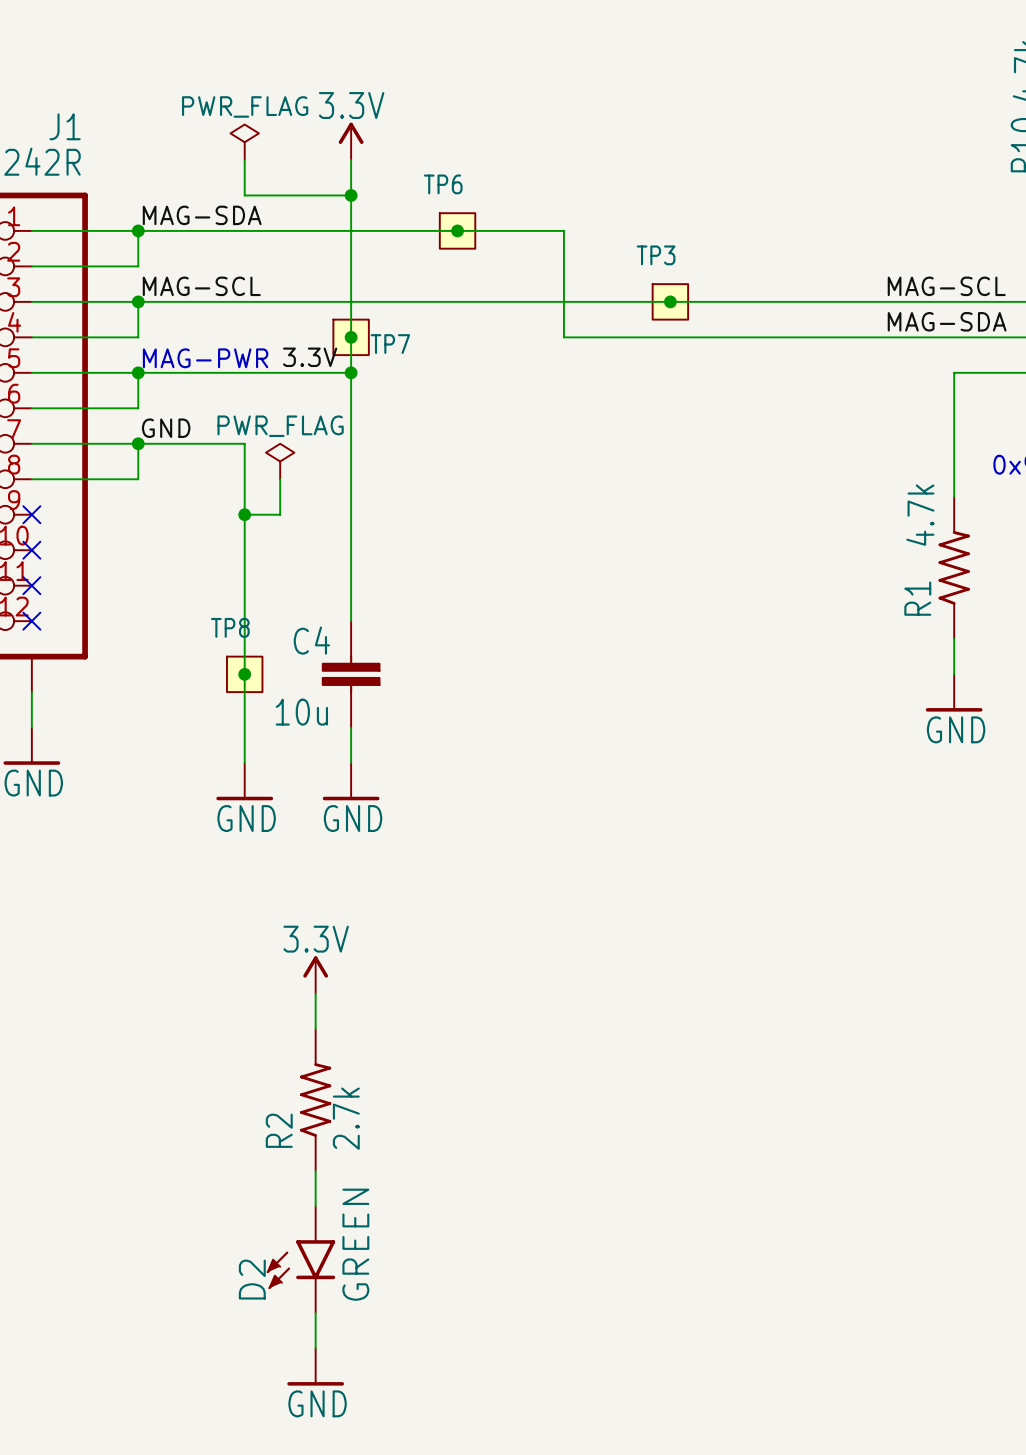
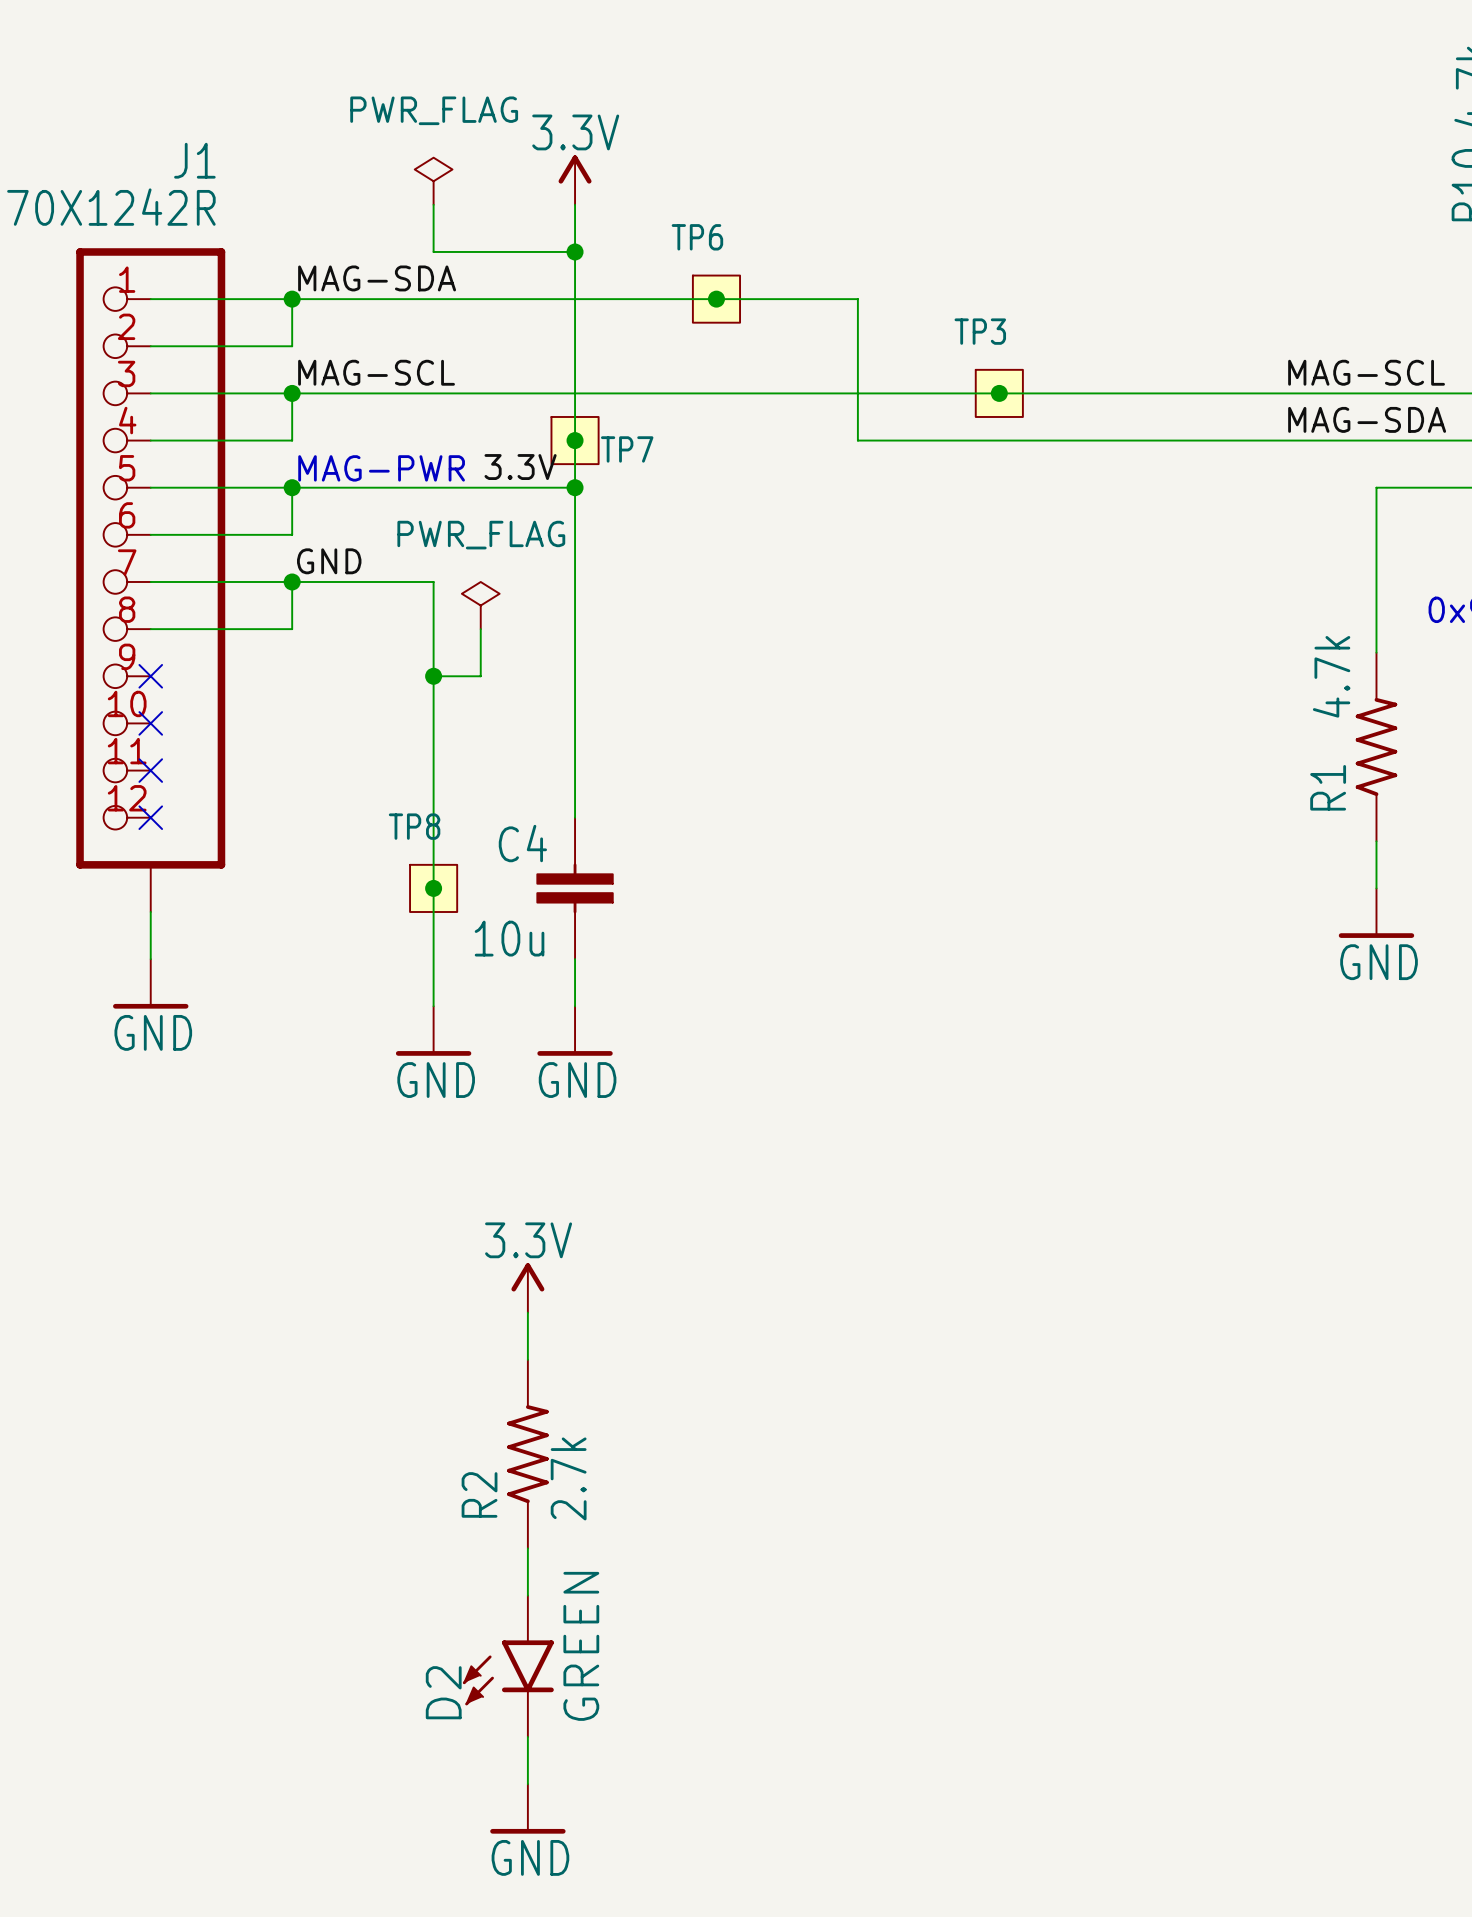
power symbol text position: PWR_FLAG (245, 106) -> PWR_FLAG (434, 110)
power symbol text position: PWR_FLAG (280, 426) -> PWR_FLAG (481, 535)

